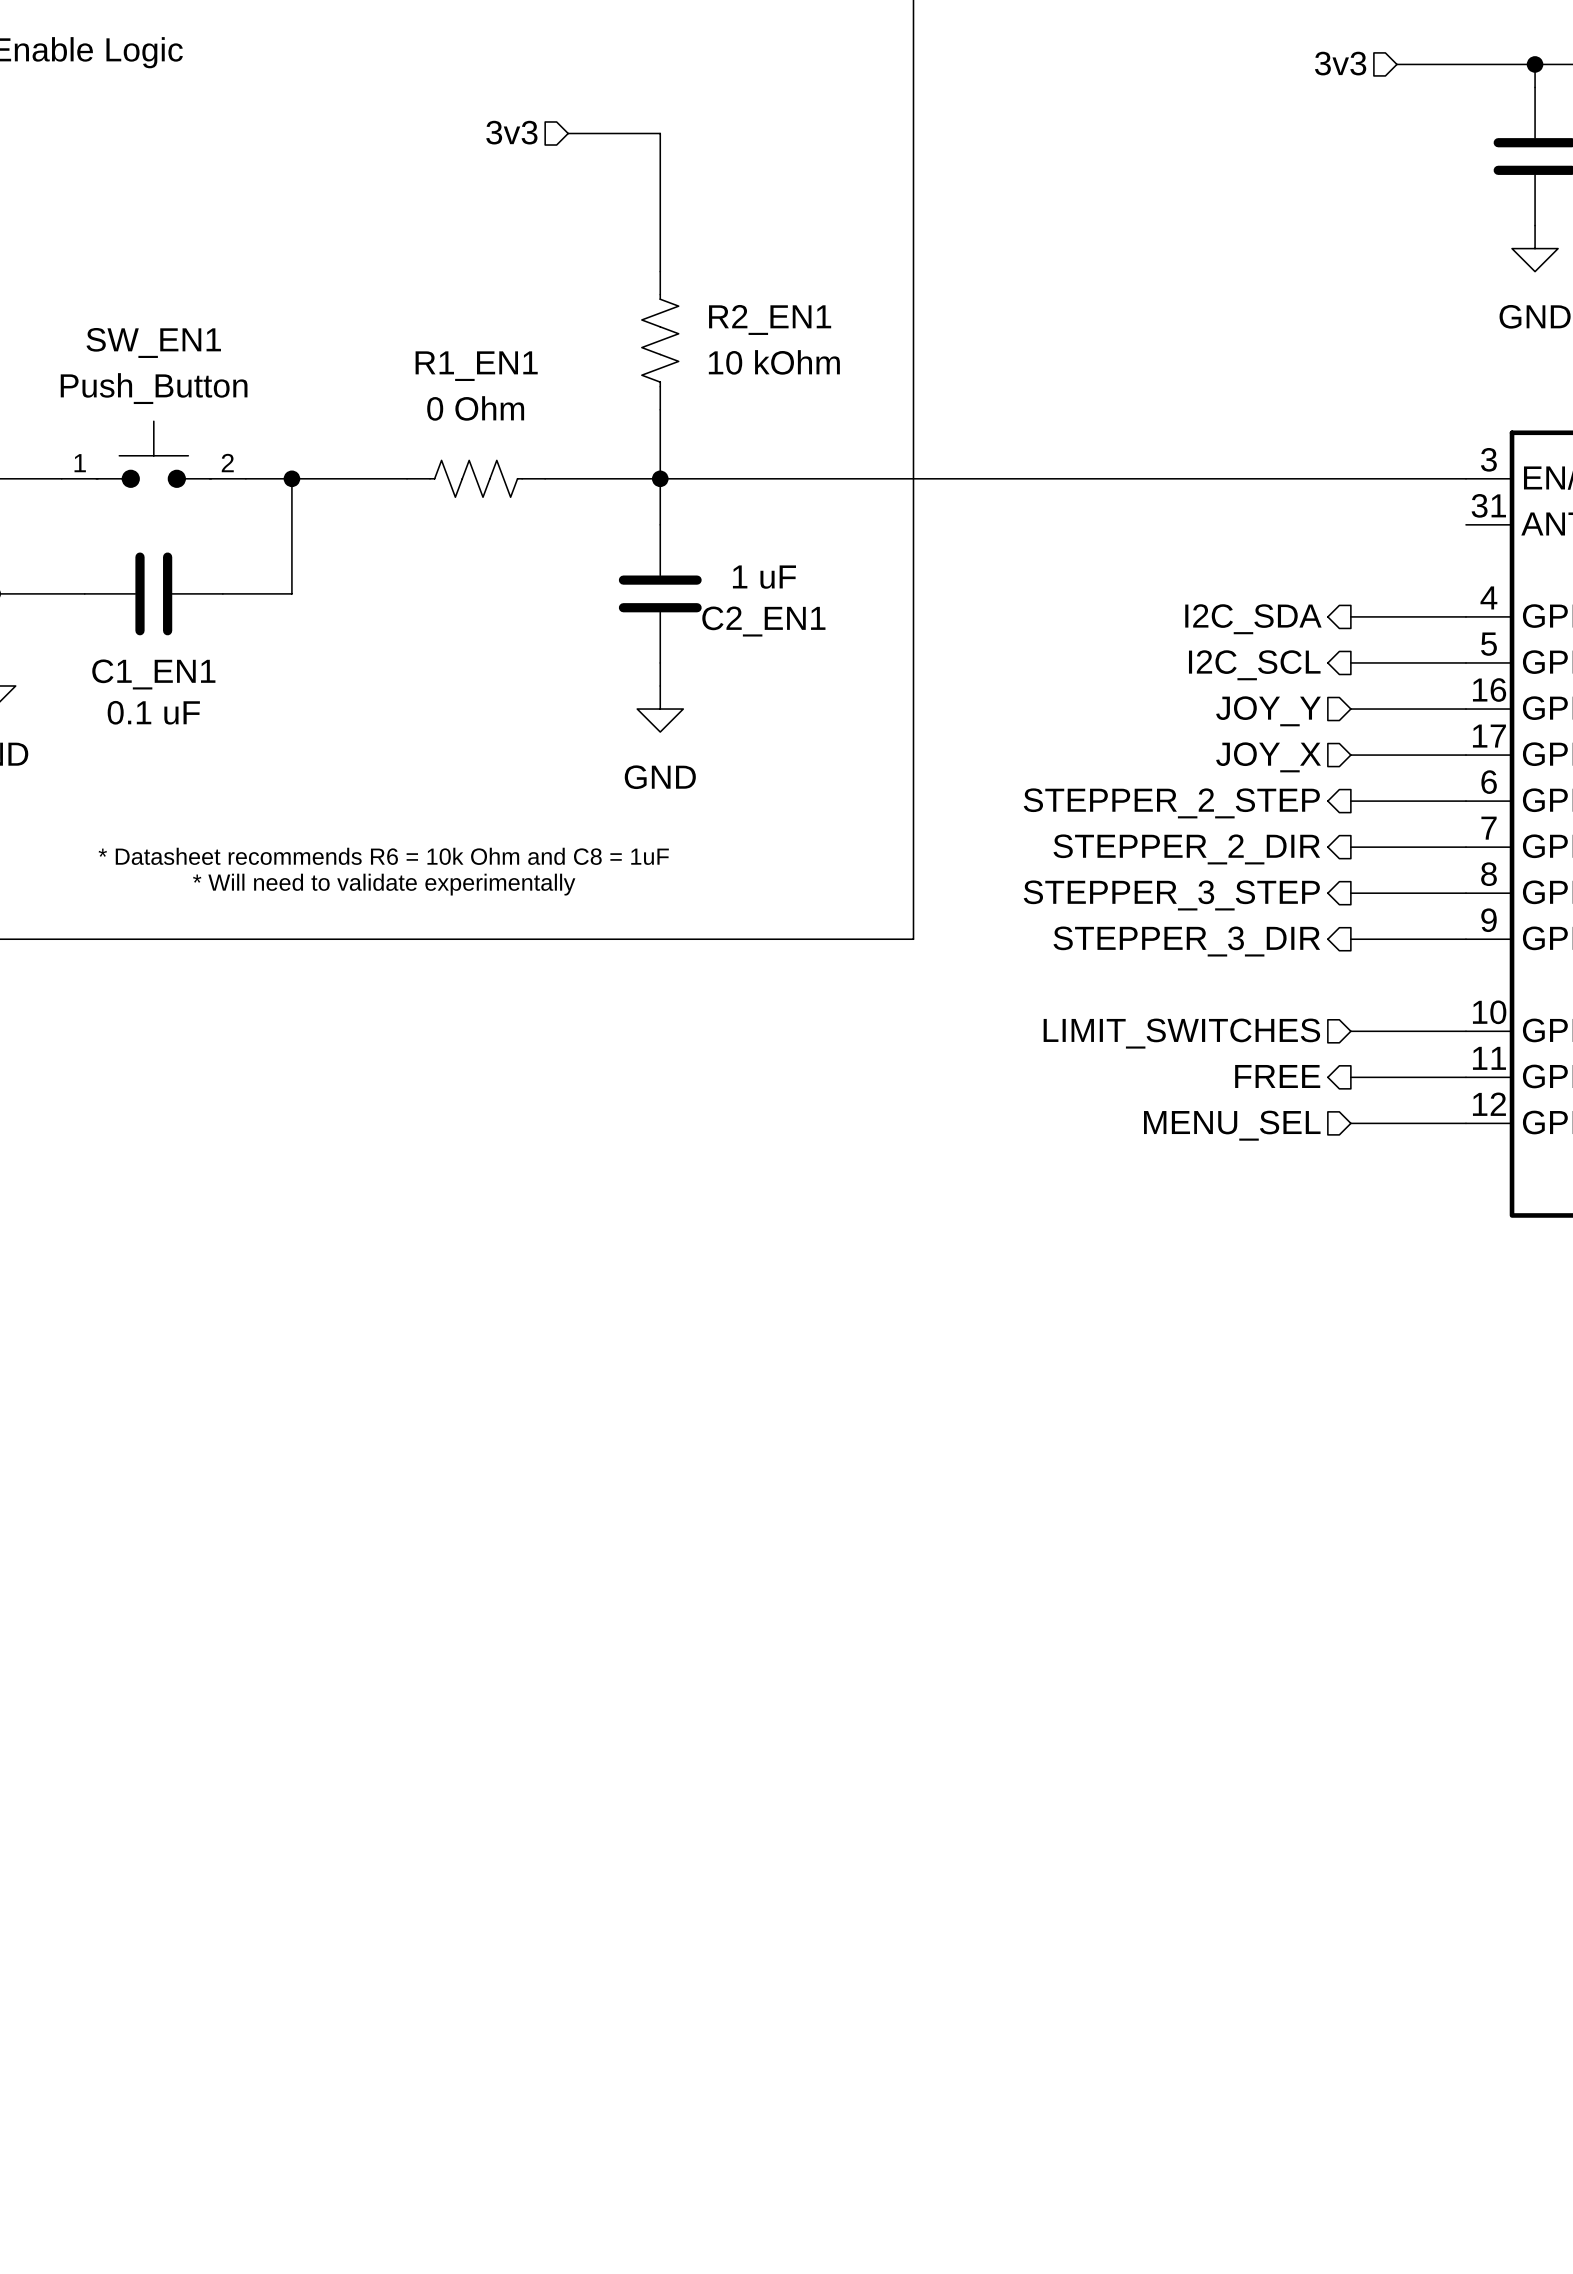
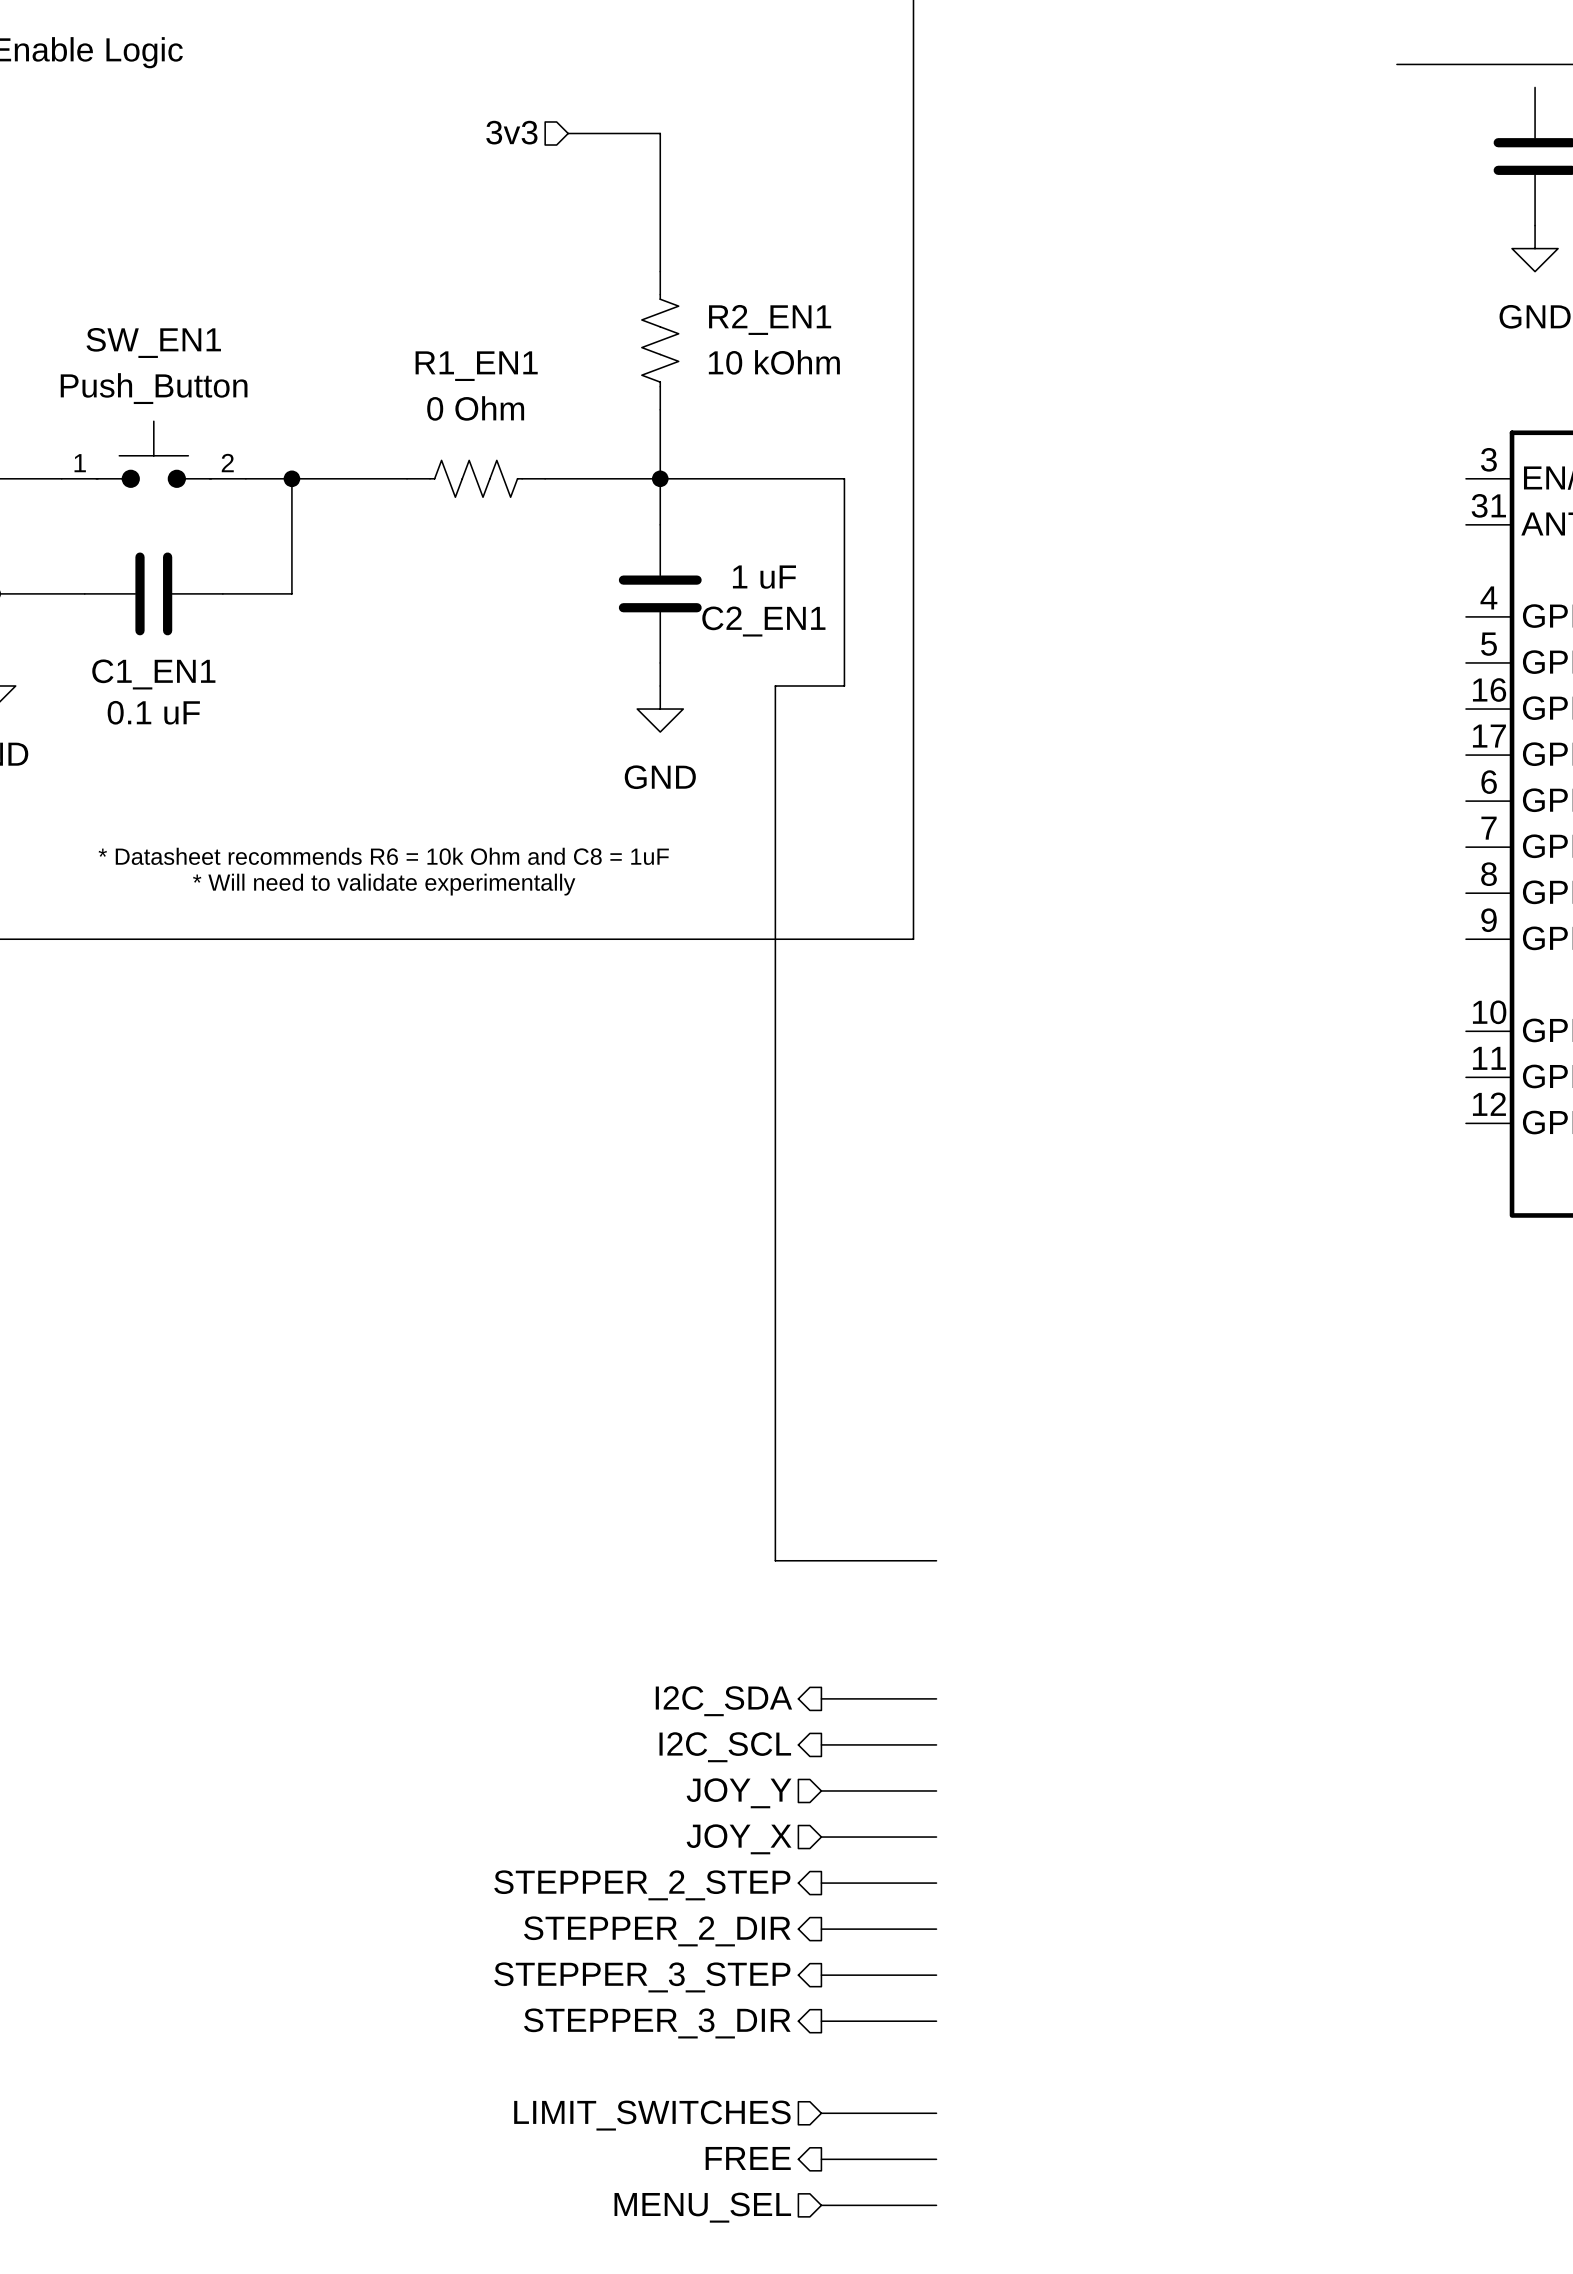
hierarchical label: 3v3 (1340, 63) -> none
wire: (1535, 64) (1535, 87) -> none
junction: (1535, 64) -> none
wire: (844, 478) (1465, 478) -> (844, 478) (844, 685) (775, 685) (775, 1560) (936, 1560)
wire: (1350, 616) (1465, 616) -> none
hierarchical label: I2C_SDA (1253, 619) -> none
wire: (1350, 662) (1465, 662) -> none
hierarchical label: I2C_SCL (1254, 665) -> none
wire: (1350, 709) (1465, 709) -> none
hierarchical label: JOY_Y (1268, 711) -> none
wire: (1350, 755) (1465, 755) -> none
hierarchical label: JOY_X (1268, 757) -> none
wire: (1350, 801) (1465, 801) -> none
hierarchical label: STEPPER_2_STEP (1171, 803) -> none
wire: (1350, 847) (1465, 847) -> none
hierarchical label: STEPPER_2_DIR (1186, 849) -> none
wire: (1350, 893) (1465, 893) -> none
hierarchical label: STEPPER_3_STEP (1171, 895) -> none
wire: (1350, 939) (1465, 939) -> none
hierarchical label: STEPPER_3_DIR (1186, 941) -> none
wire: (1350, 1031) (1465, 1031) -> none
hierarchical label: LIMIT_SWITCHES (1181, 1033) -> none
hierarchical label: FREE (1277, 1076) -> none
wire: (1350, 1077) (1465, 1077) -> none
wire: (1350, 1123) (1465, 1123) -> none
hierarchical label: MENU_SEL (1232, 1125) -> none
wire: none -> (821, 1698) (936, 1698)
hierarchical label: none -> I2C_SDA (723, 1701)
wire: none -> (821, 1744) (936, 1744)
hierarchical label: none -> I2C_SCL (725, 1747)
wire: none -> (821, 1790) (936, 1790)
hierarchical label: none -> JOY_Y (739, 1793)
wire: none -> (821, 1837) (936, 1837)
hierarchical label: none -> JOY_X (739, 1839)
wire: none -> (821, 1883) (936, 1883)
hierarchical label: none -> STEPPER_2_STEP (642, 1885)
wire: none -> (821, 1929) (936, 1929)
hierarchical label: none -> STEPPER_2_DIR (657, 1931)
wire: none -> (821, 1975) (936, 1975)
hierarchical label: none -> STEPPER_3_STEP (642, 1977)
wire: none -> (821, 2021) (936, 2021)
hierarchical label: none -> STEPPER_3_DIR (657, 2023)
wire: none -> (821, 2113) (936, 2113)
hierarchical label: none -> LIMIT_SWITCHES (652, 2115)
hierarchical label: none -> FREE (748, 2158)
wire: none -> (821, 2159) (936, 2159)
wire: none -> (821, 2205) (936, 2205)
hierarchical label: none -> MENU_SEL (702, 2207)

